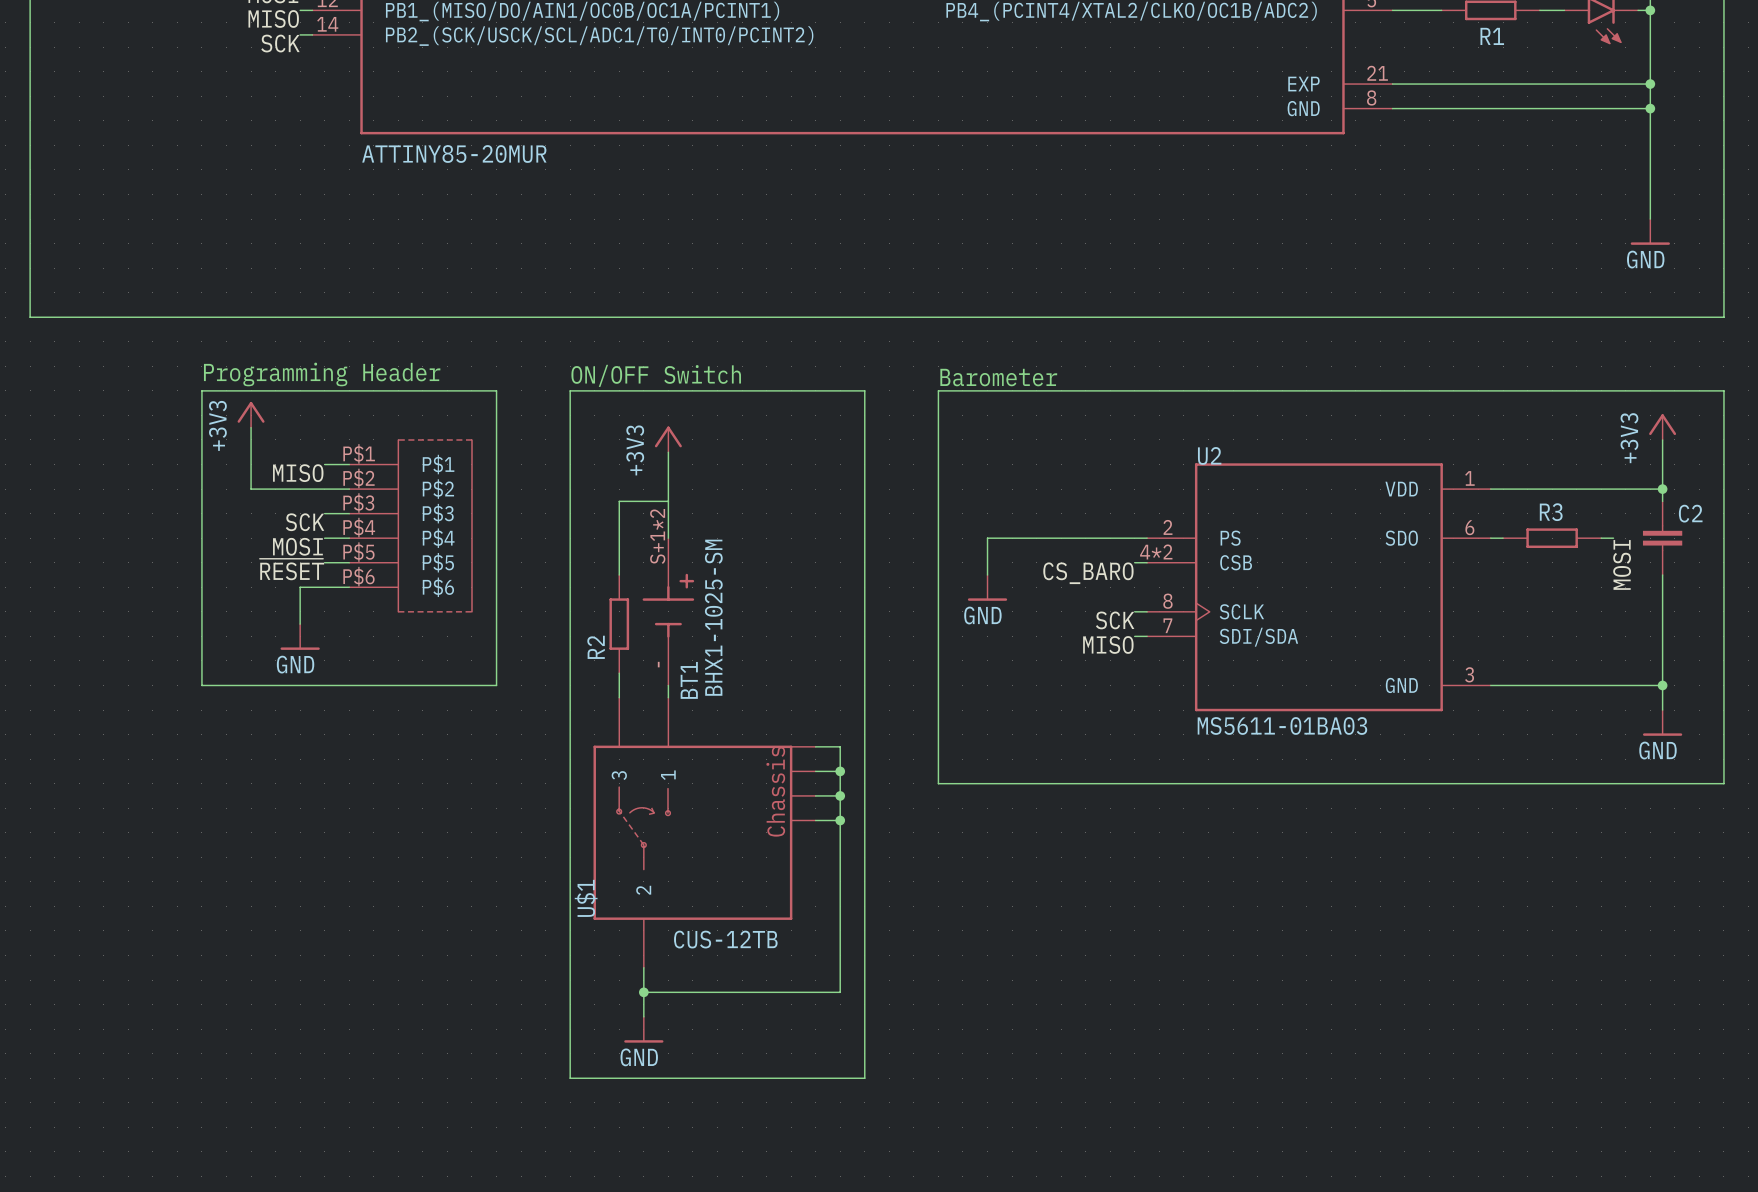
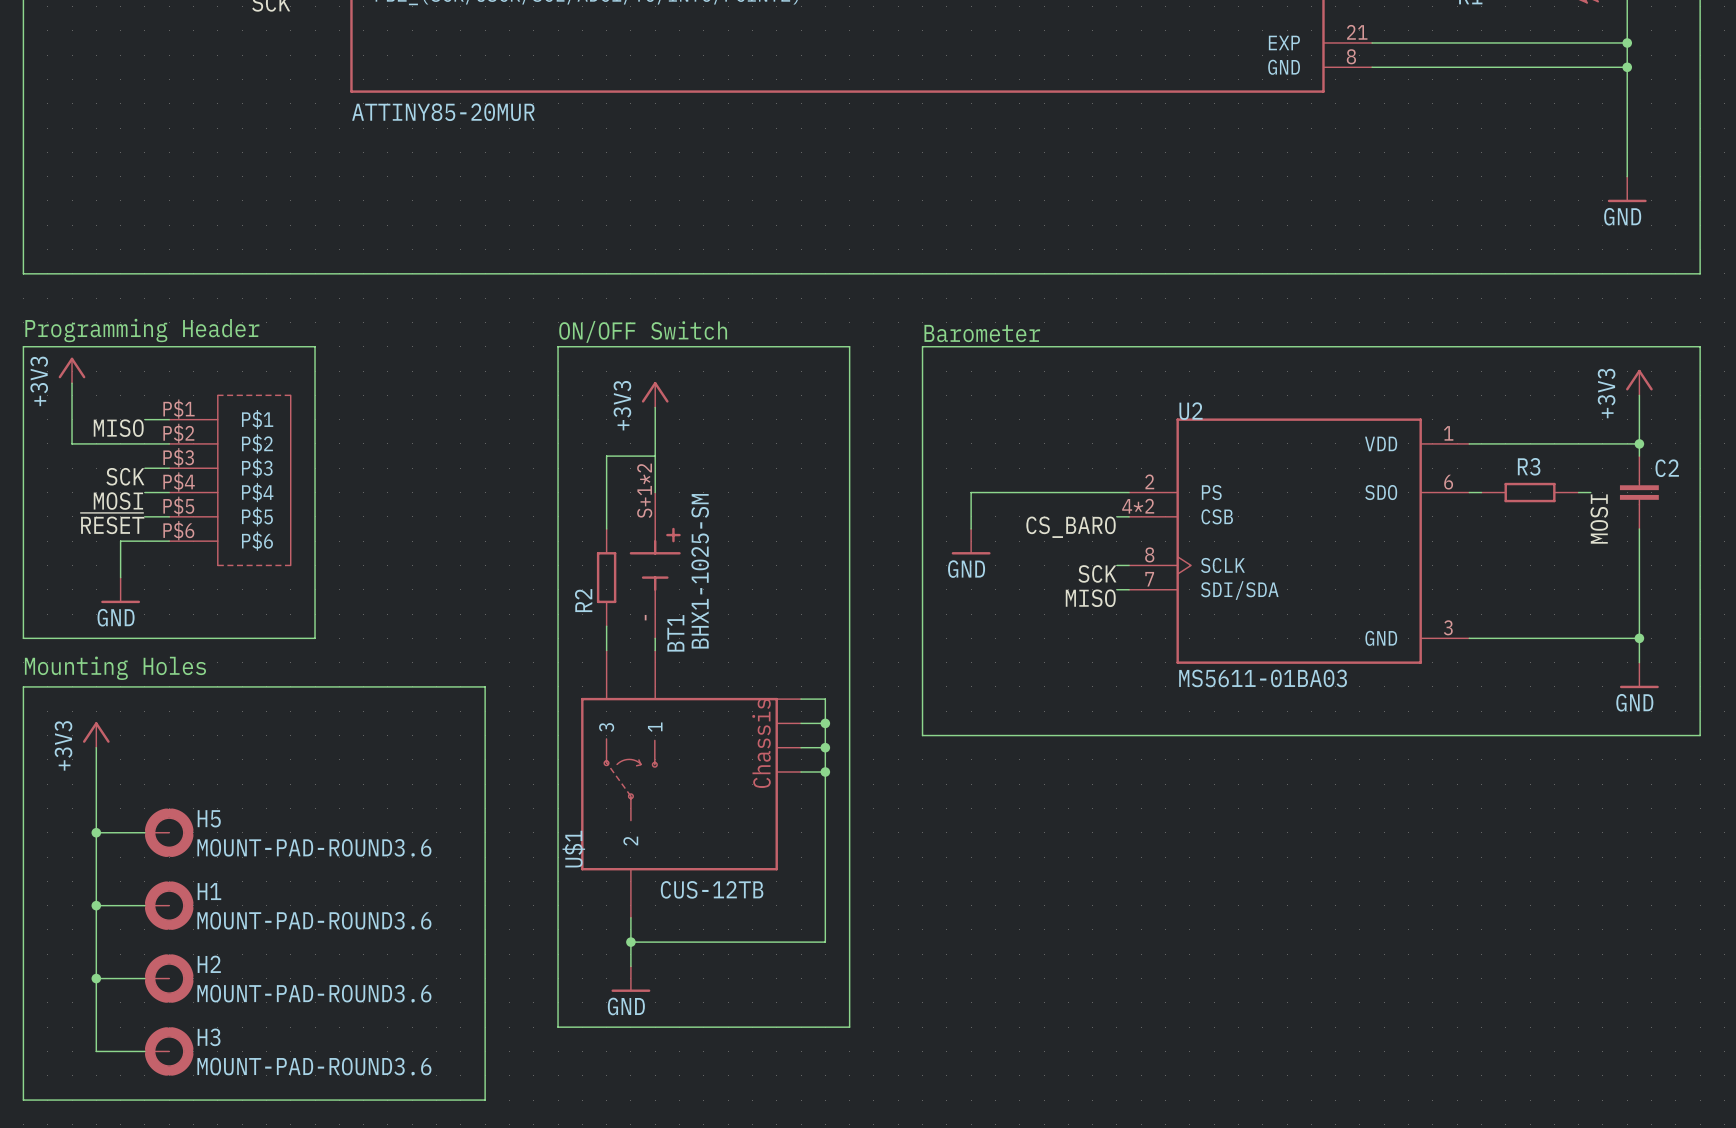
text position: Programming Header (322, 374) -> Programming Header (142, 330)
wire: (201, 390) (201, 685) -> (193, 346) (23, 346) (23, 638) (193, 638)
wire: (324, 390) (496, 390) (496, 685) (324, 685) -> (315, 346) (315, 638)
power symbol position: +3V3 (251, 414) -> +3V3 (72, 370)
wire: (251, 427) (251, 489) (349, 489) -> (72, 383) (72, 443) (169, 443)
wire: (324, 464) (349, 464) -> (144, 419) (169, 419)
label position: MISO (298, 473) -> MISO (118, 428)
wire: (324, 513) (349, 513) -> (144, 468) (169, 468)
label position: SCK (305, 522) -> SCK (125, 476)
part position: (410, 525) -> (230, 480)
wire: (324, 538) (349, 538) -> (144, 492) (169, 492)
label position: MOSI (297, 546) -> MOSI (118, 501)
wire: (324, 562) (349, 562) -> (144, 516) (169, 516)
label position: ~{RESET} (291, 569) -> ~{RESET} (112, 523)
wire: (349, 587) (300, 587) (300, 624) -> (169, 541) (120, 541) (120, 577)
power symbol position: GND (300, 636) -> GND (120, 590)
text: none -> Mounting Holes (115, 668)
wire: none -> (23, 686) (23, 1100) (485, 1100) (485, 686) (23, 686)
power symbol: none -> +3V3 (96, 734)
wire: none -> (96, 747) (96, 1051) (144, 1051)
wire: none -> (96, 832) (144, 832)
junction: none -> (96, 832)
H5: none -> MOUNT-PAD-ROUND3.6 (169, 832)
wire: none -> (96, 905) (144, 905)
junction: none -> (96, 905)
H1: none -> MOUNT-PAD-ROUND3.6 (169, 905)
wire: none -> (96, 978) (144, 978)
junction: none -> (96, 978)
H2: none -> MOUNT-PAD-ROUND3.6 (169, 978)
H3: none -> MOUNT-PAD-ROUND3.6 (169, 1051)

